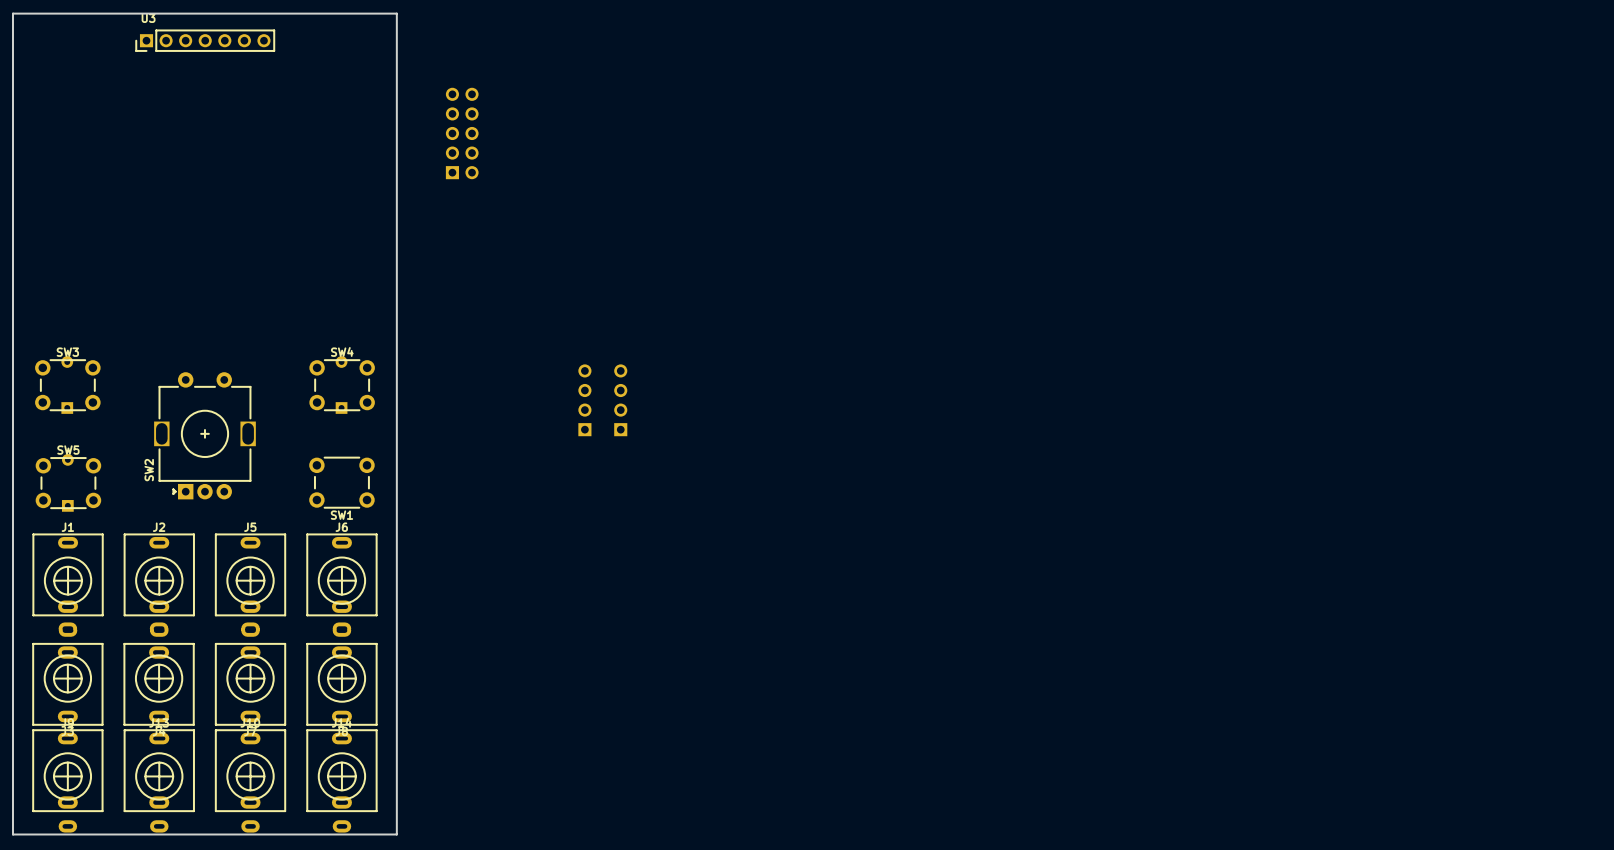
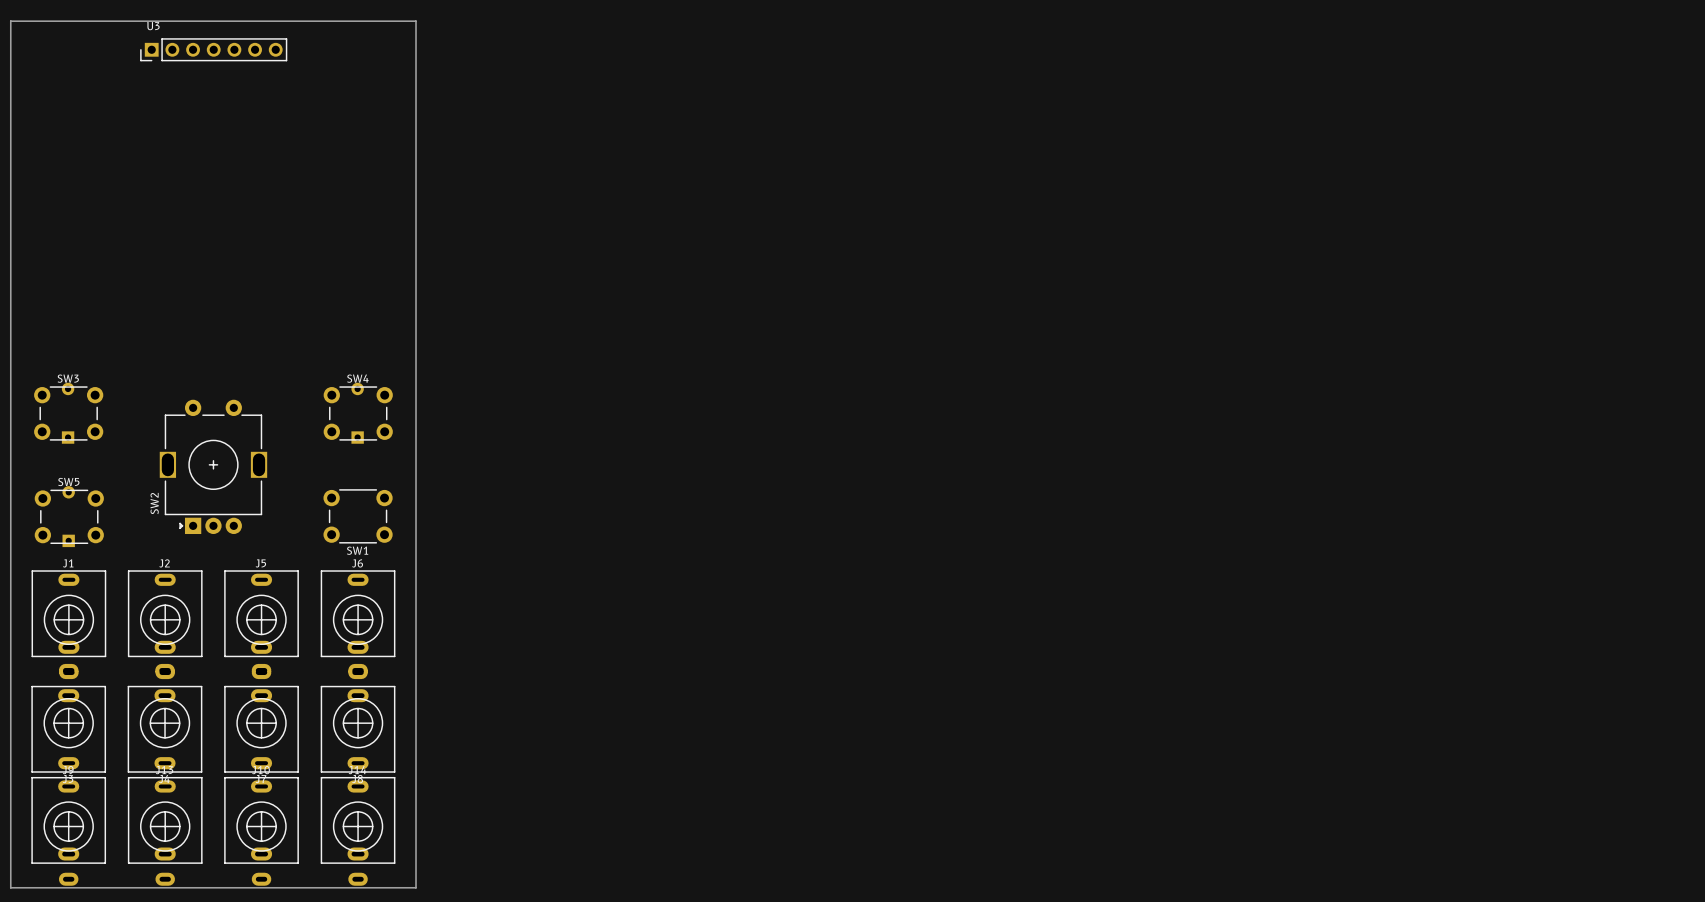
part: (462, 133) -> none
part: (584, 400) -> none
part: (620, 400) -> none

